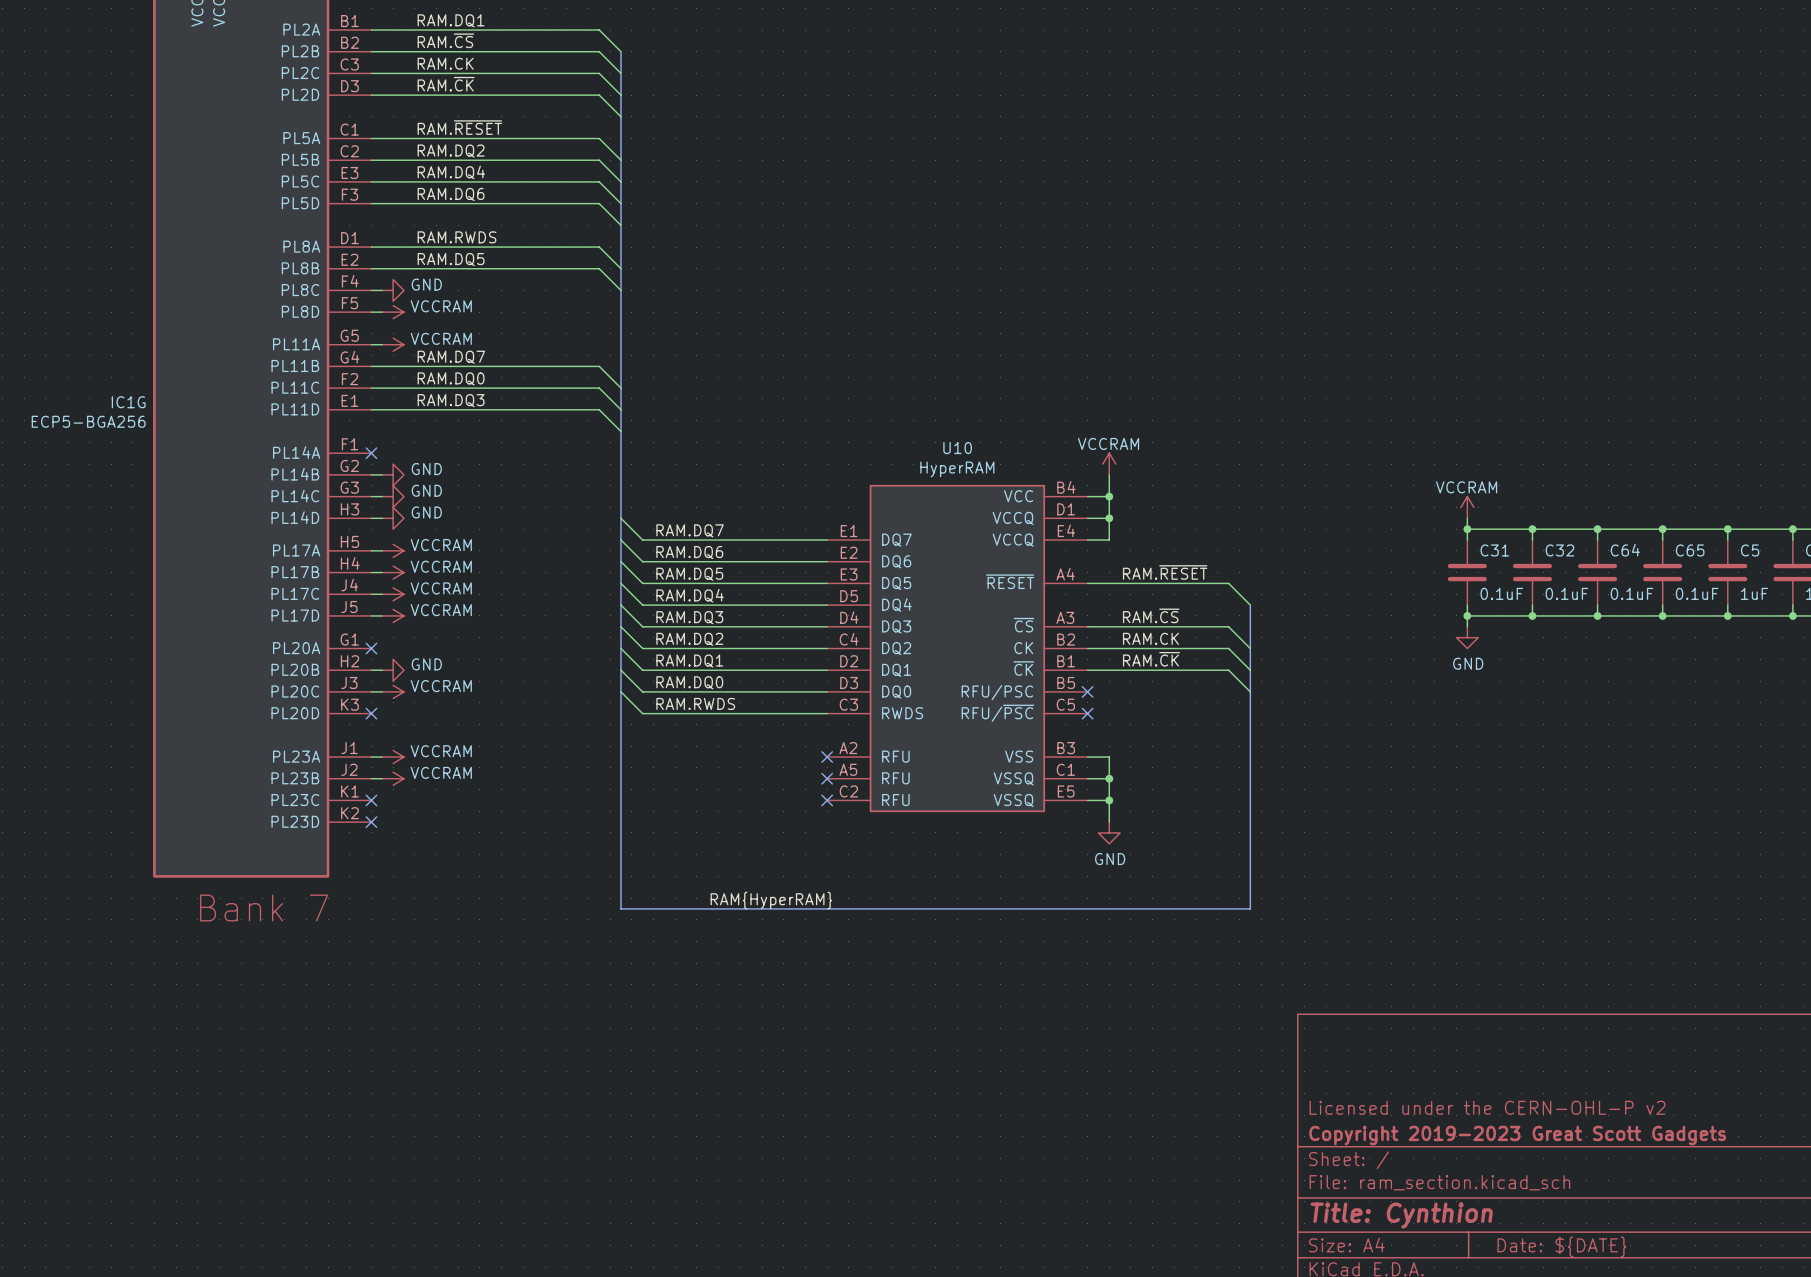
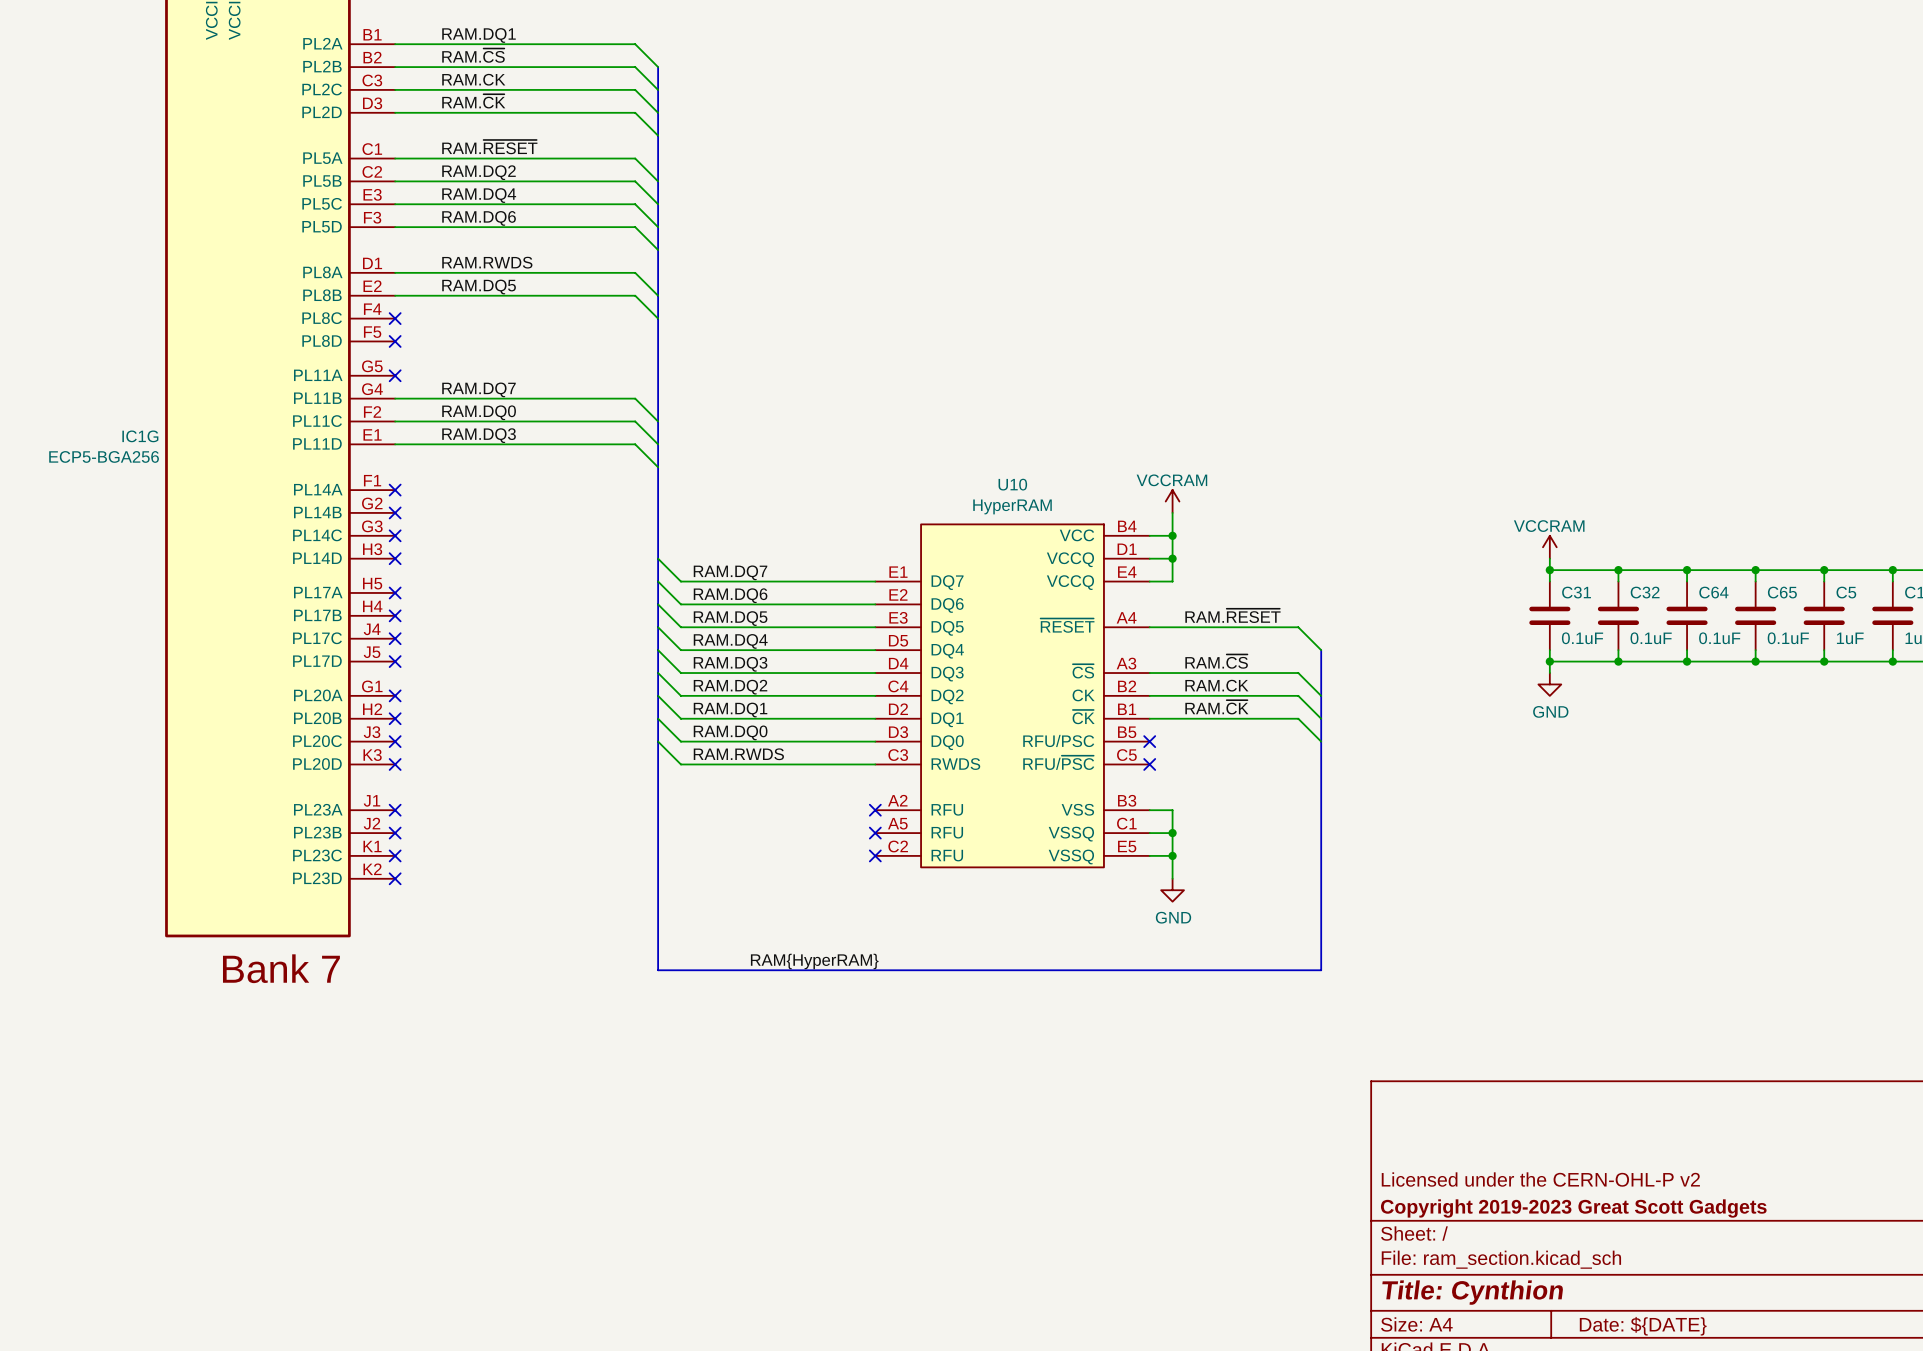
wire: (371, 290) (382, 290) -> none
no-connect mark: none -> (395, 318)
power symbol: GND (393, 290) -> none
wire: (371, 312) (382, 312) -> none
no-connect mark: none -> (395, 341)
power symbol: VCCRAM (393, 312) -> none
wire: (371, 344) (382, 344) -> none
no-connect mark: none -> (395, 375)
power symbol: VCCRAM (393, 344) -> none
wire: (371, 474) (382, 474) -> none
no-connect mark: none -> (395, 512)
power symbol: GND (393, 474) -> none
wire: (371, 496) (382, 496) -> none
no-connect mark: none -> (395, 535)
power symbol: GND (393, 496) -> none
wire: (371, 518) (382, 518) -> none
no-connect mark: none -> (395, 558)
power symbol: GND (393, 518) -> none
wire: (371, 550) (382, 550) -> none
no-connect mark: none -> (395, 592)
power symbol: VCCRAM (393, 550) -> none
wire: (371, 572) (382, 572) -> none
no-connect mark: none -> (395, 615)
power symbol: VCCRAM (393, 572) -> none
wire: (371, 594) (382, 594) -> none
no-connect mark: none -> (395, 638)
power symbol: VCCRAM (393, 594) -> none
wire: (371, 615) (382, 615) -> none
no-connect mark: none -> (395, 661)
power symbol: VCCRAM (393, 615) -> none
wire: (371, 670) (382, 670) -> none
no-connect mark: none -> (395, 718)
power symbol: GND (393, 670) -> none
wire: (371, 691) (382, 691) -> none
no-connect mark: none -> (395, 741)
power symbol: VCCRAM (393, 691) -> none
wire: (371, 757) (382, 757) -> none
no-connect mark: none -> (395, 810)
power symbol: VCCRAM (393, 757) -> none
wire: (371, 778) (382, 778) -> none
no-connect mark: none -> (395, 833)
power symbol: VCCRAM (393, 778) -> none

